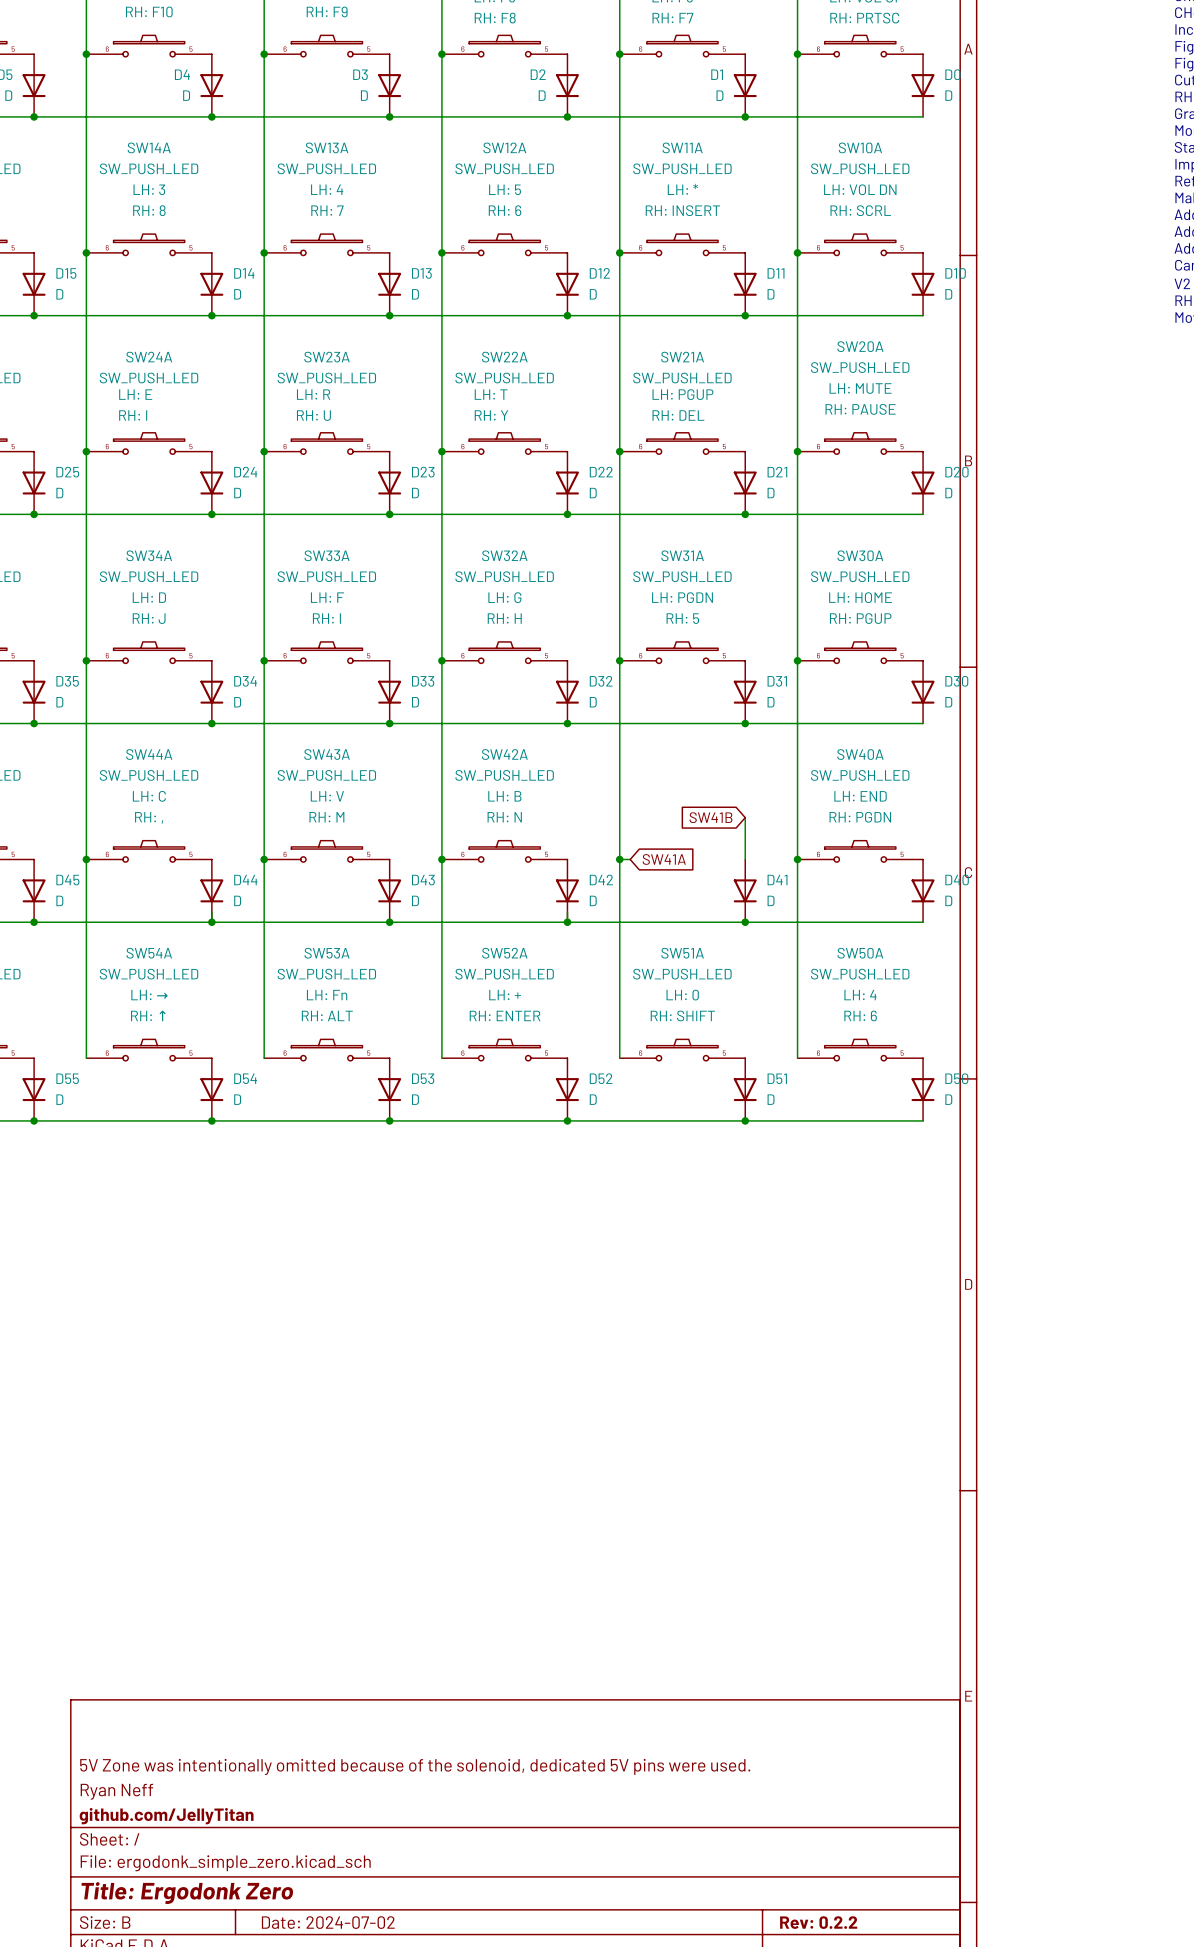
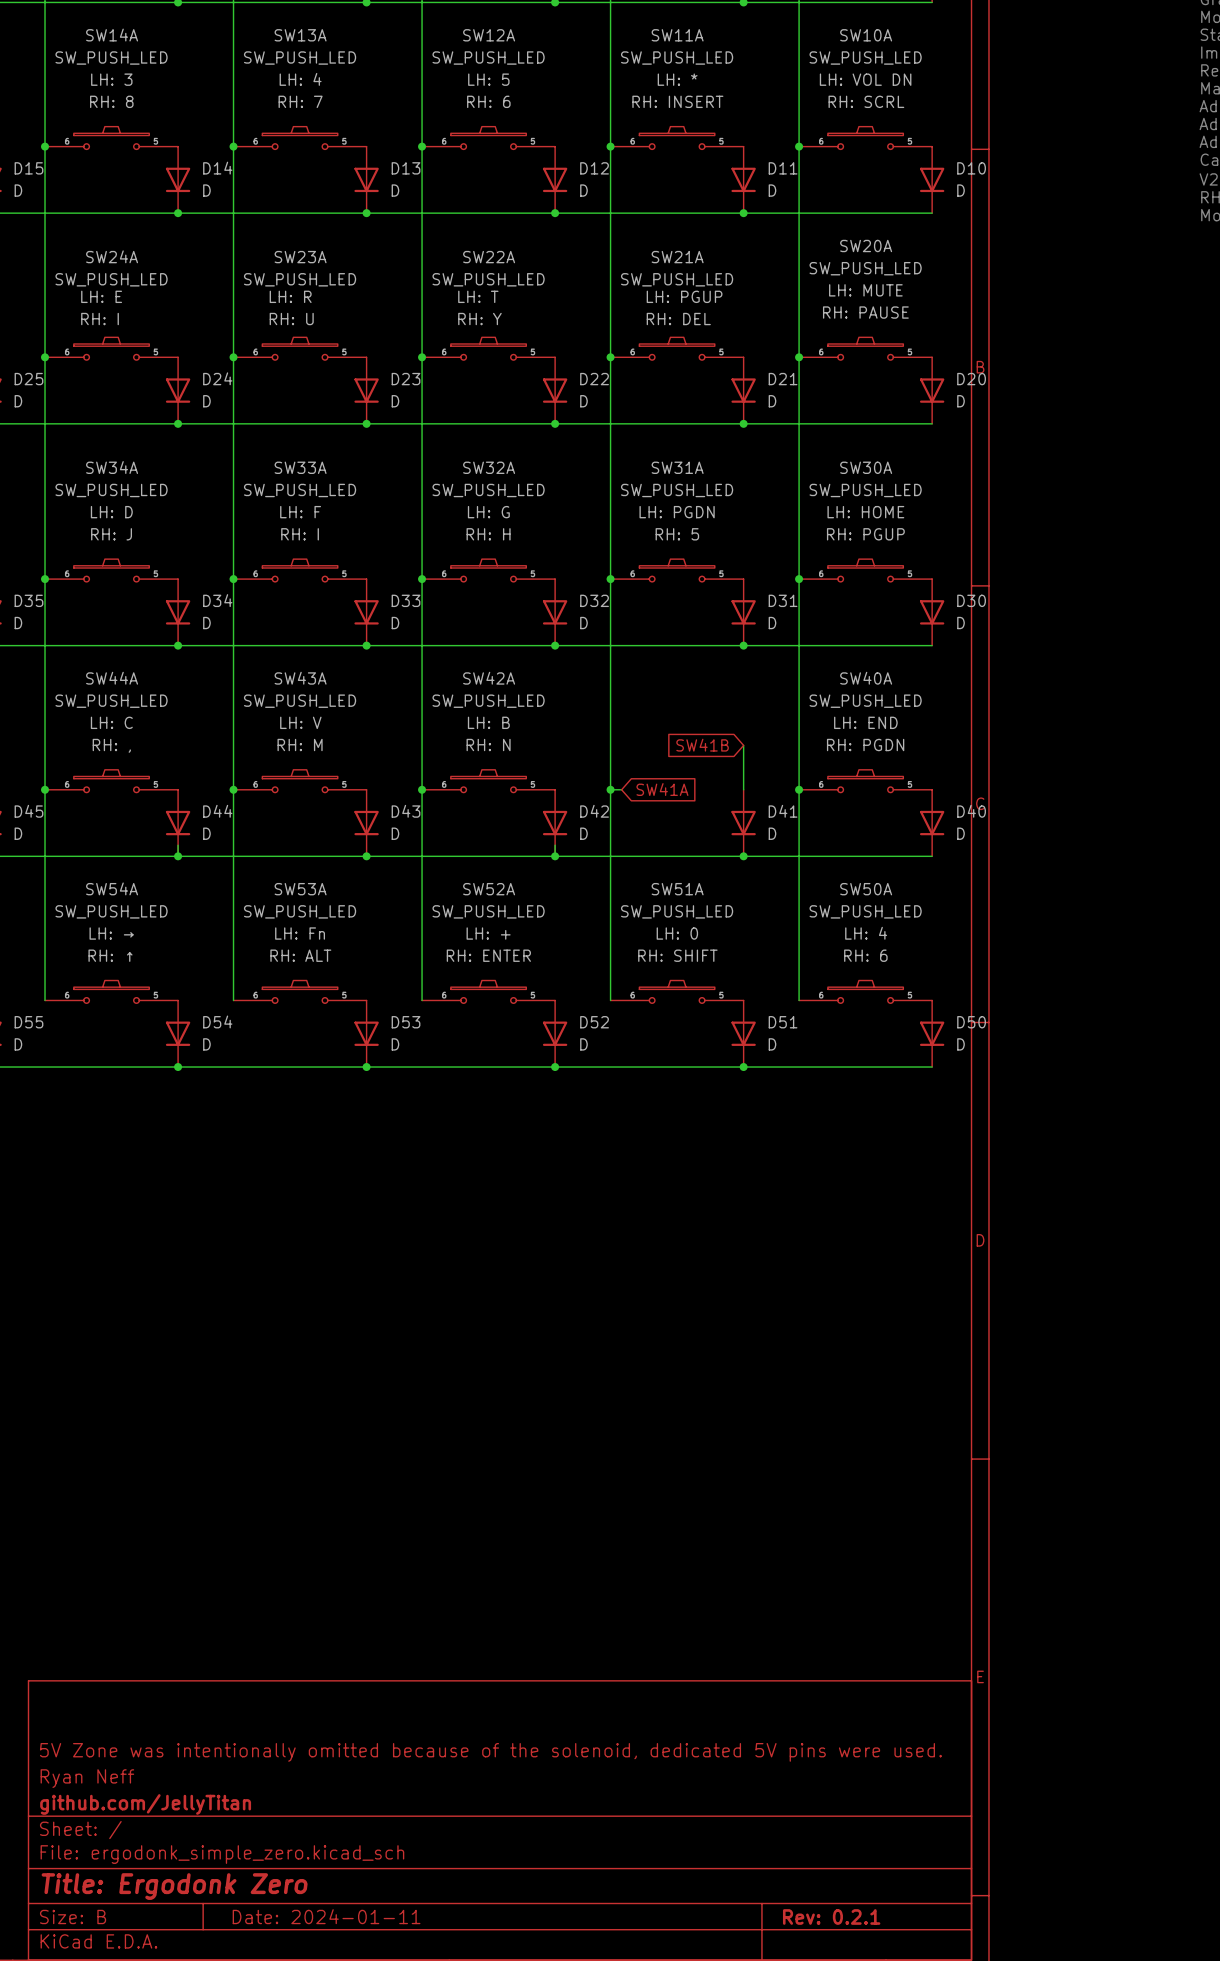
title block: Date: 2024-07-02 (328, 1922) -> Date: 2024-01-11 (326, 1916)
title block: Rev: 0.2.2 (818, 1922) -> Rev: 0.2.1 (831, 1916)

